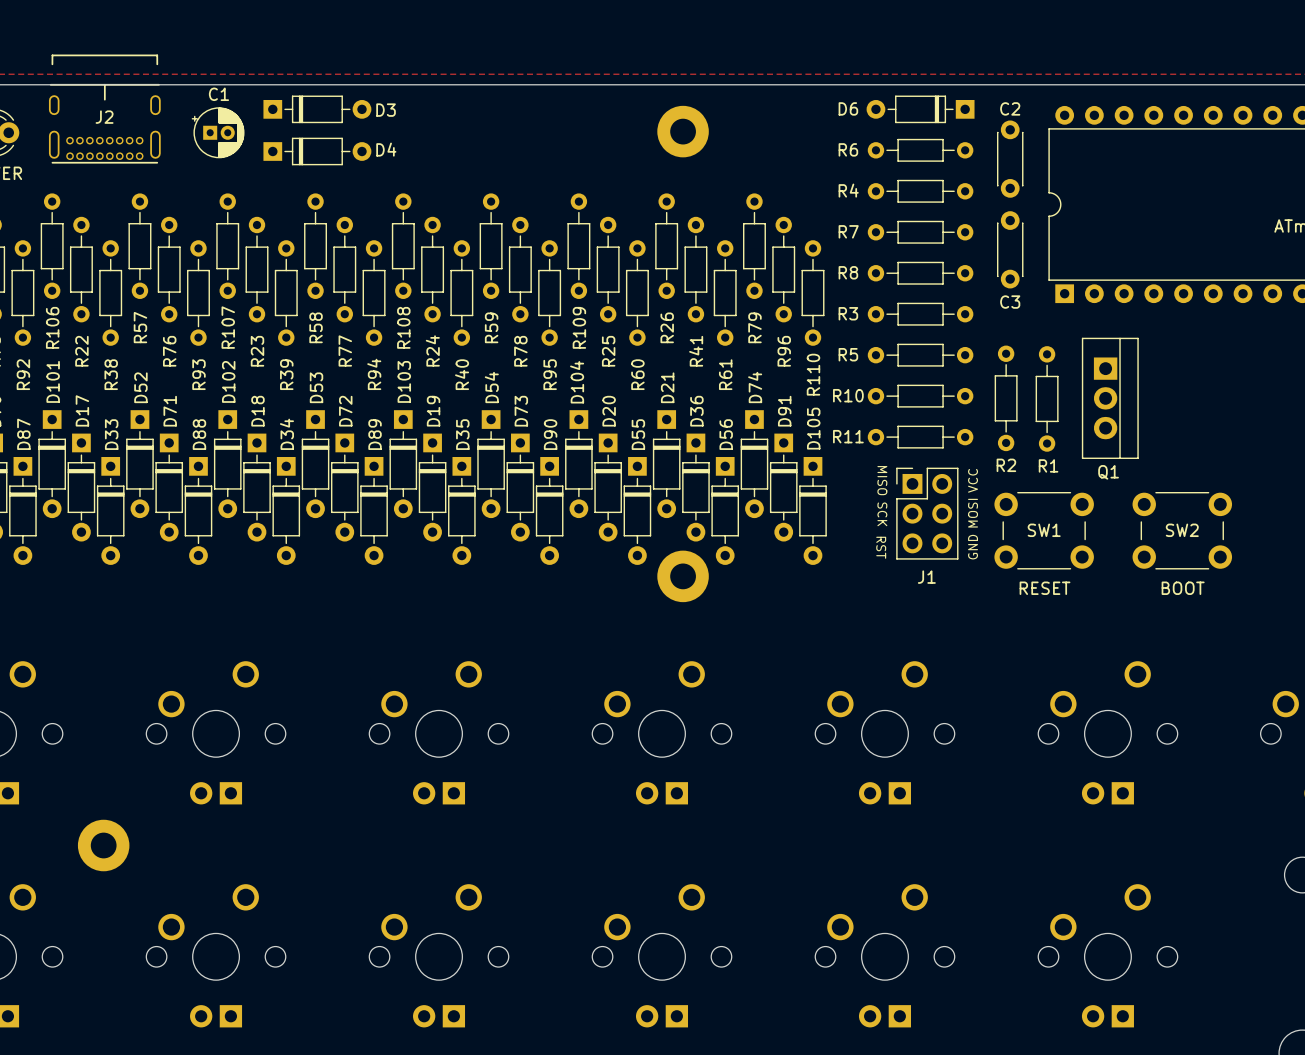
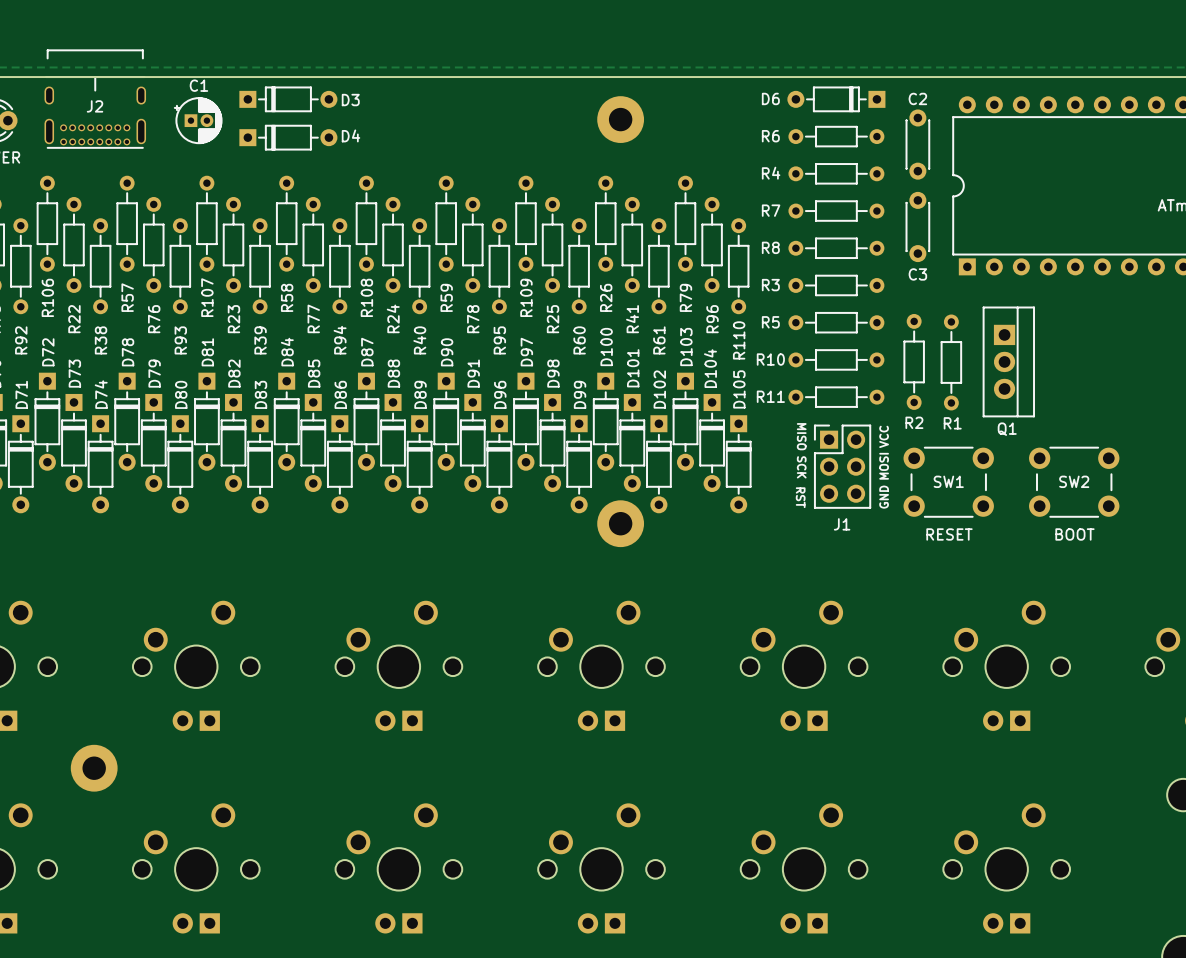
D101 name: D101 (53, 381) -> D72 (48, 352)
D102 name: D102 (228, 381) -> D81 (207, 352)
D103 name: D103 (404, 381) -> D87 (367, 352)
D104 name: D104 (577, 382) -> D97 (526, 352)
D52 name: D52 (140, 387) -> D78 (128, 352)
D53 name: D53 (316, 387) -> D84 (287, 352)
D54 name: D54 (491, 387) -> D90 (447, 352)
D21 name: D21 (667, 387) -> D100 (606, 347)
D74 name: D74 (755, 387) -> D103 (686, 347)
D17 name: D17 (82, 410) -> D73 (74, 373)
D71 name: D71 (170, 411) -> D79 (154, 373)
D18 name: D18 (257, 411) -> D82 (234, 373)
D72 name: D72 (345, 411) -> D85 (314, 373)
D19 name: D19 (433, 411) -> D88 (393, 373)
D73 name: D73 (521, 411) -> D91 (473, 373)
D20 name: D20 (609, 411) -> D98 (553, 373)
D36 name: D36 (696, 411) -> D101 (633, 368)
D91 name: D91 (784, 411) -> D104 (710, 368)
D87 name: D87 (23, 434) -> D71 (21, 394)
D33 name: D33 (111, 434) -> D74 (101, 394)
D88 name: D88 (199, 434) -> D80 (181, 394)
D34 name: D34 (286, 434) -> D83 (260, 394)
D89 name: D89 (375, 434) -> D86 (340, 394)
D35 name: D35 (462, 434) -> D89 (420, 394)
D90 name: D90 (550, 434) -> D96 (500, 394)
D55 name: D55 (638, 434) -> D99 (580, 394)
D56 name: D56 (726, 434) -> D102 (659, 389)

